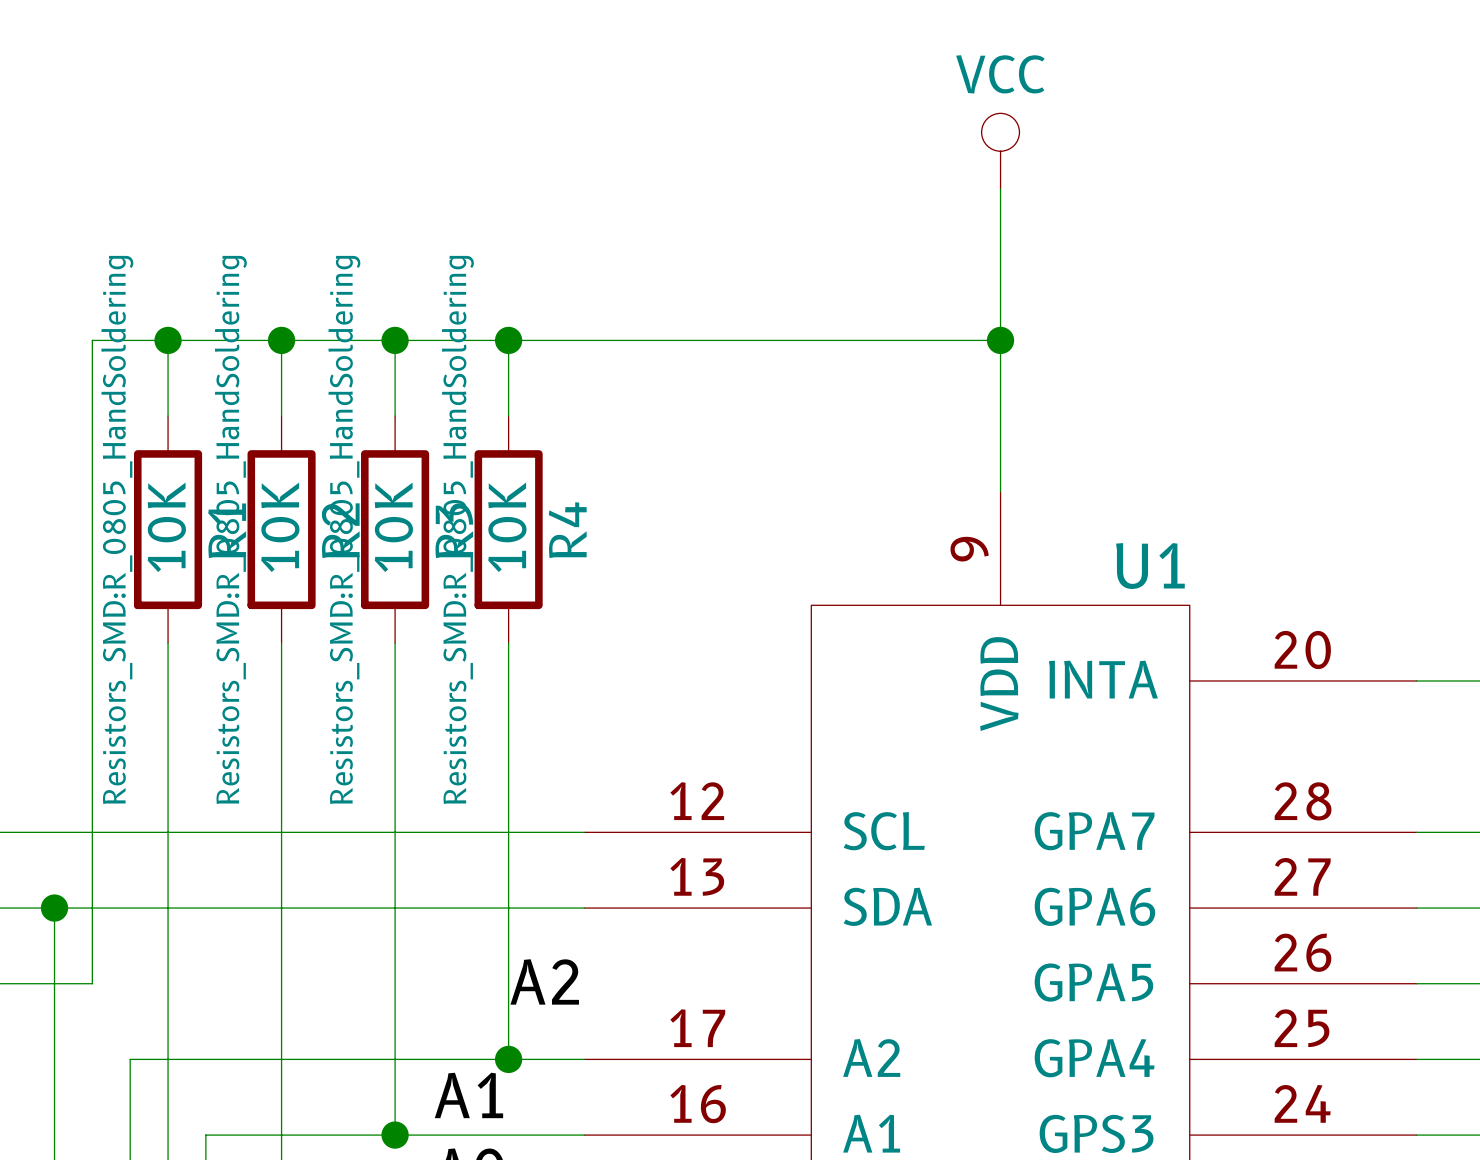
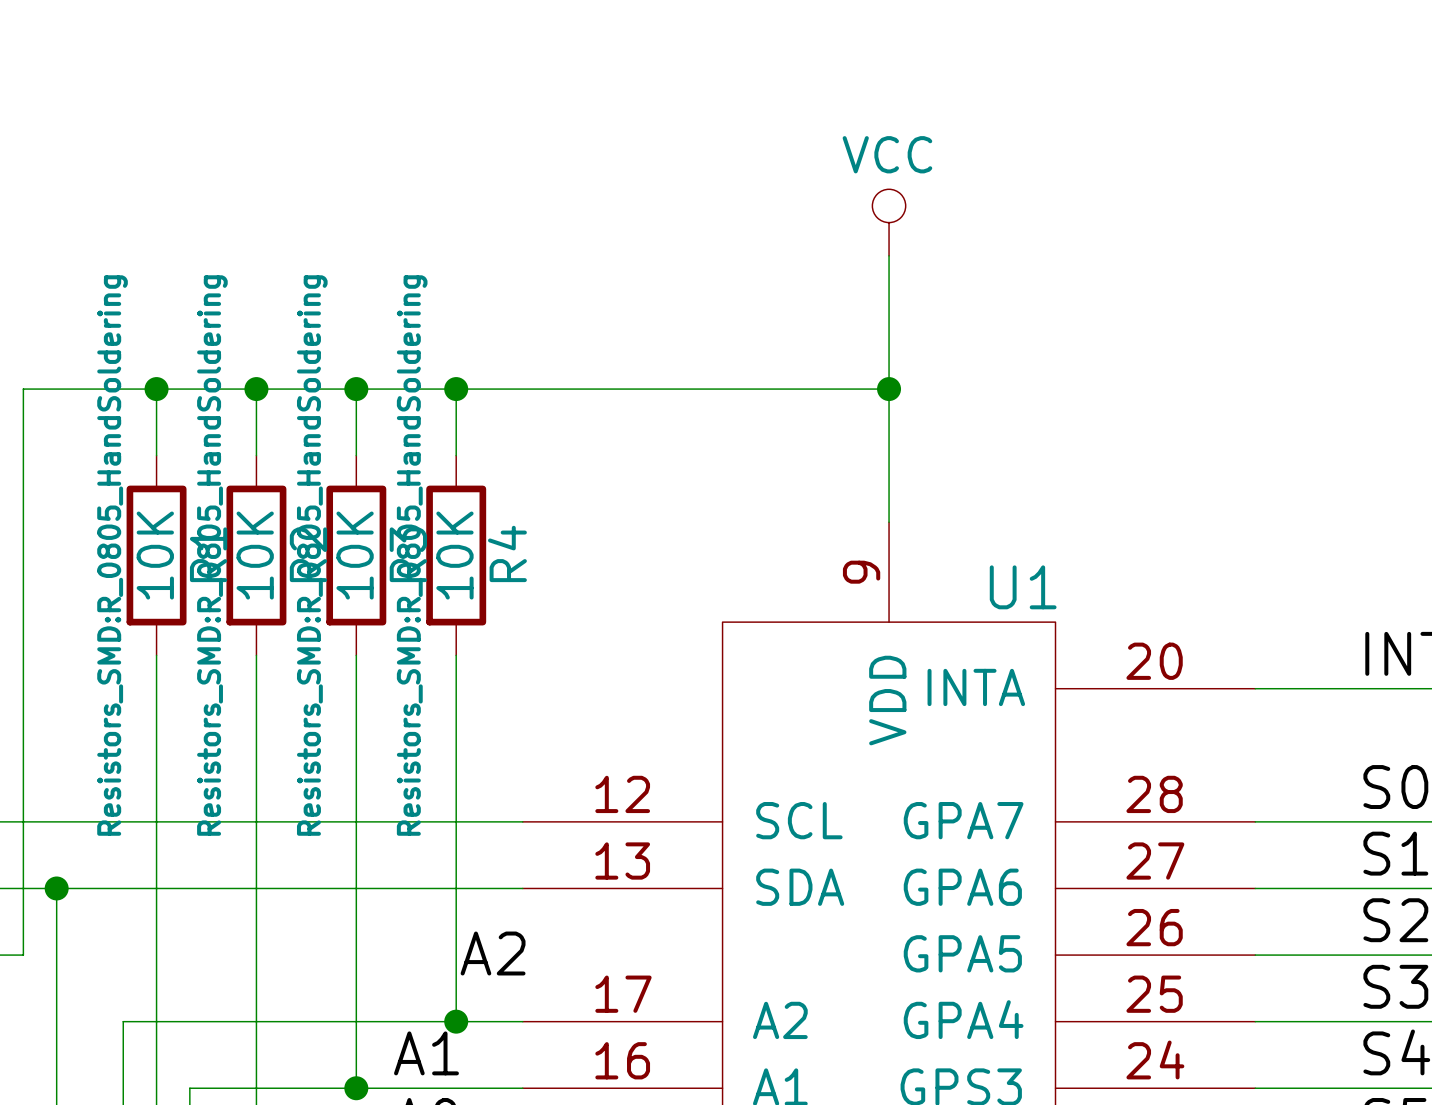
wire: (92, 340) (92, 983) (16, 983) -> (89, 389) (23, 389) (23, 955)

